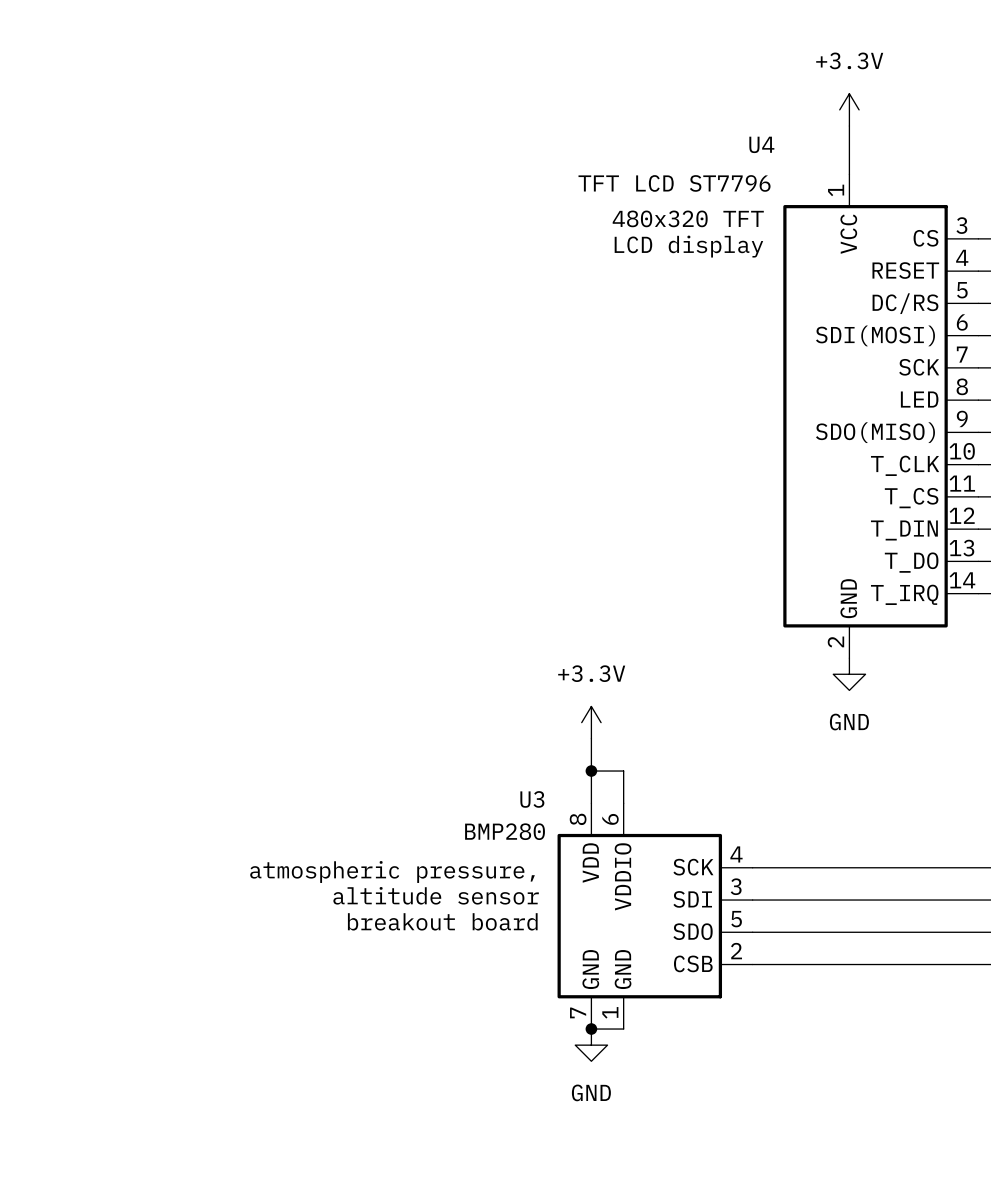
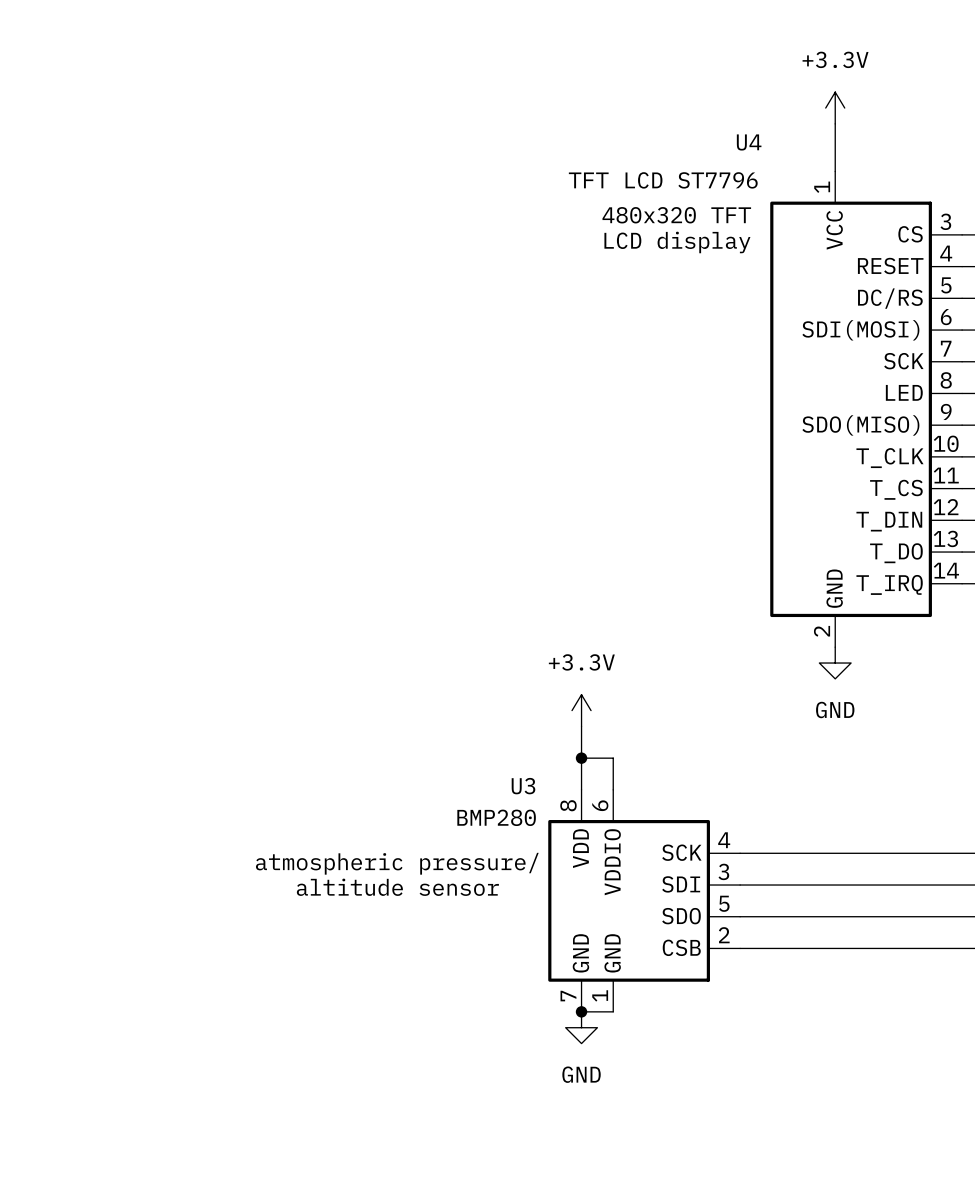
text: atmospheric pressure, (392, 872) -> atmospheric pressure/ (397, 863)
text position: altitude sensor (436, 895) -> altitude sensor (397, 887)
text: breakout board (442, 921) -> none

